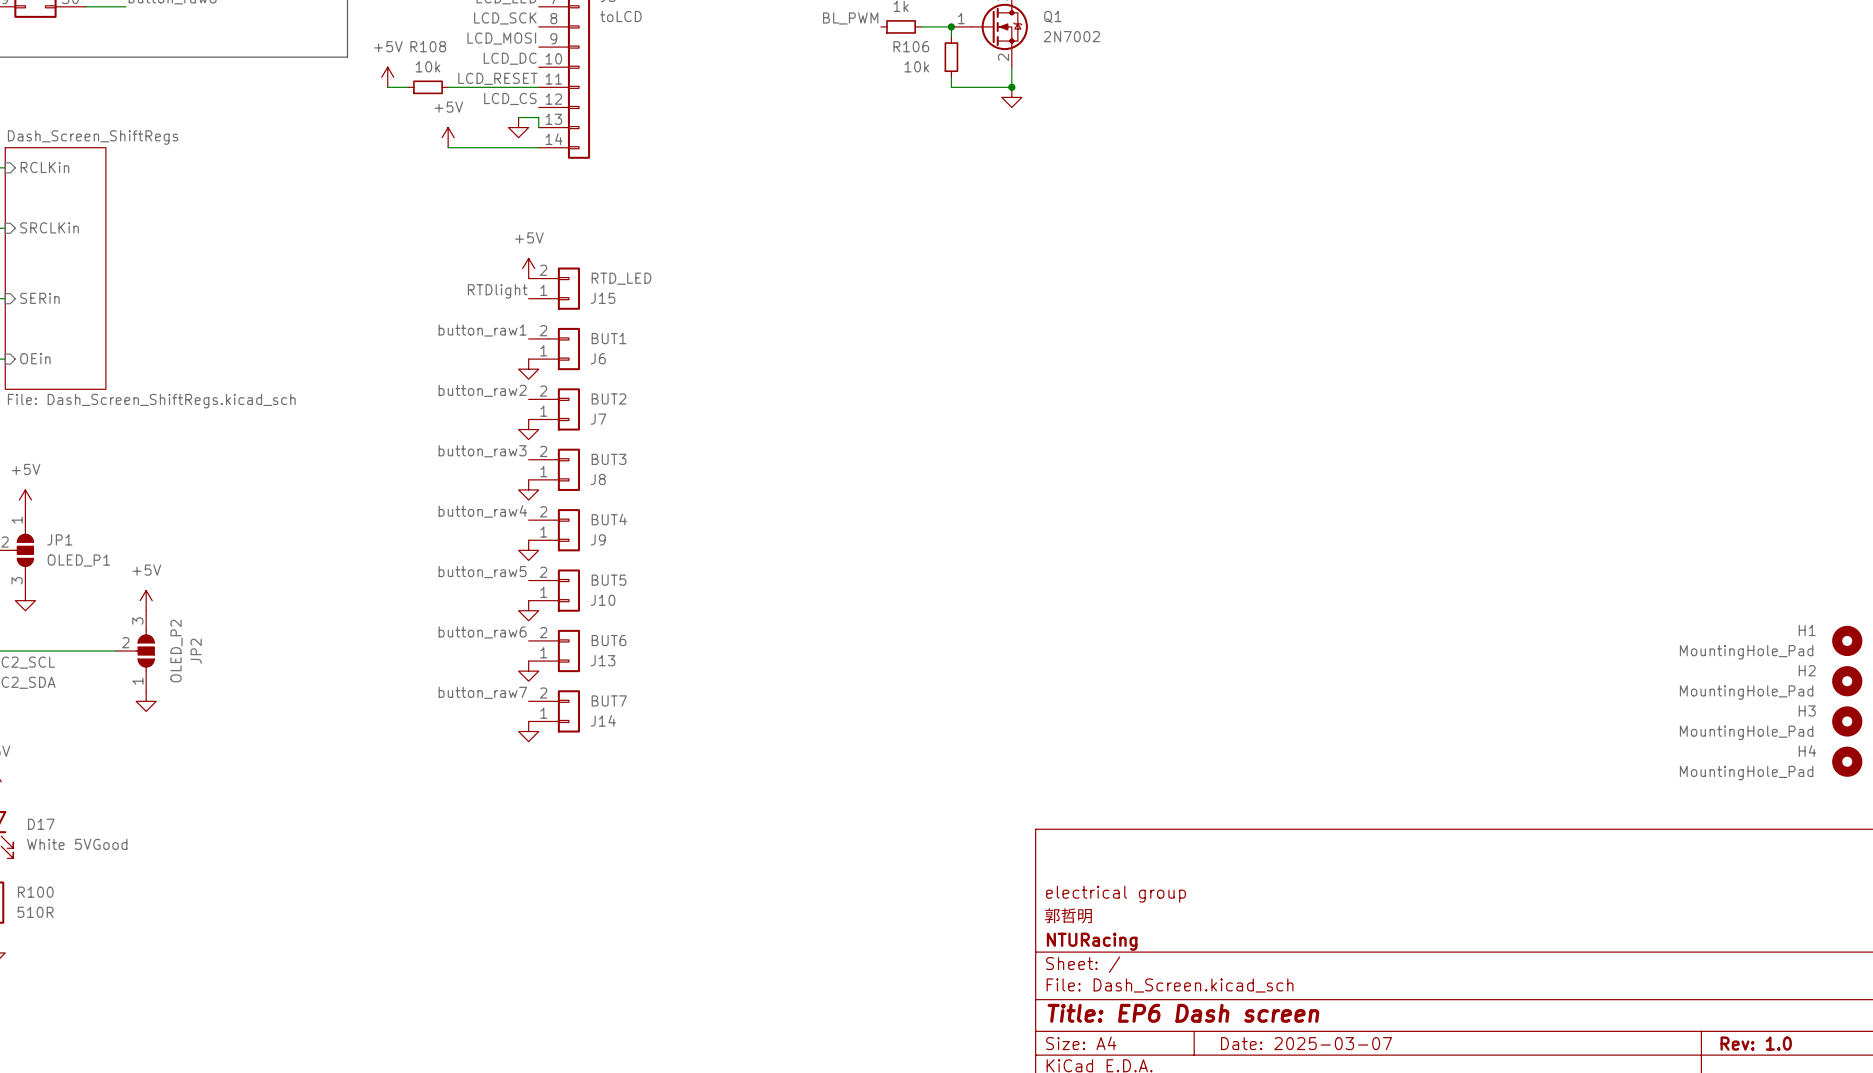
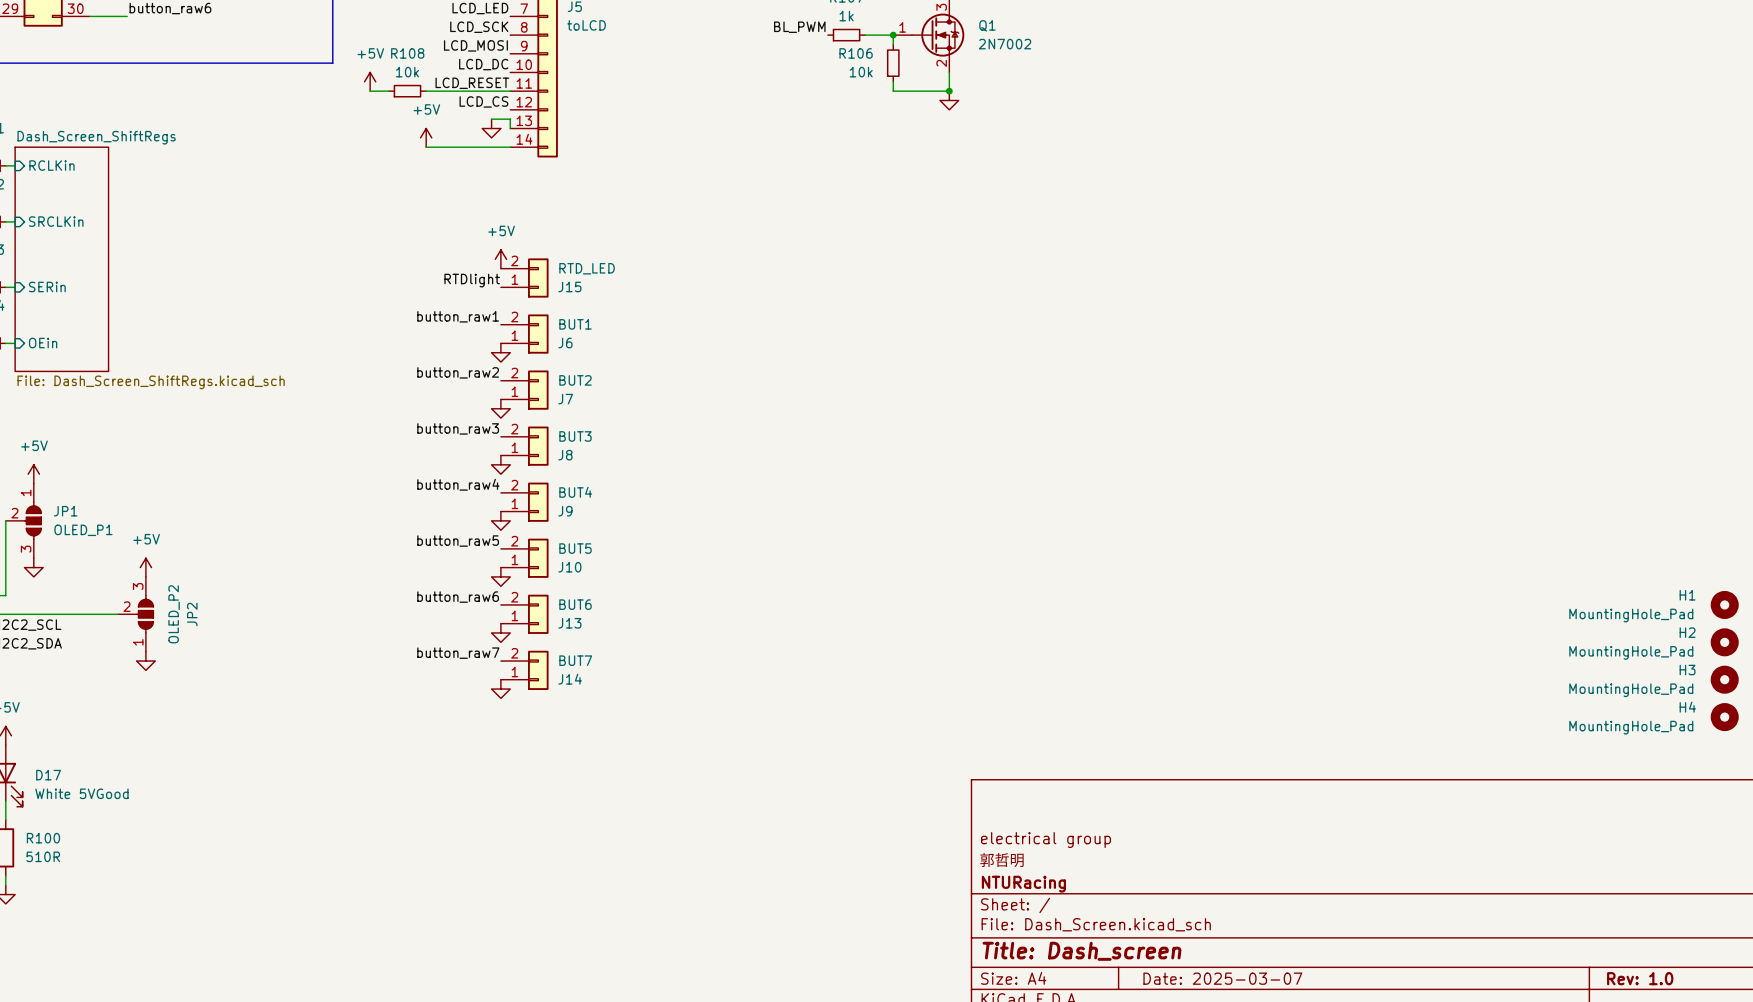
title block: Title: EP6 Dash screen (1183, 1013) -> Title: Dash_screen (1082, 951)

